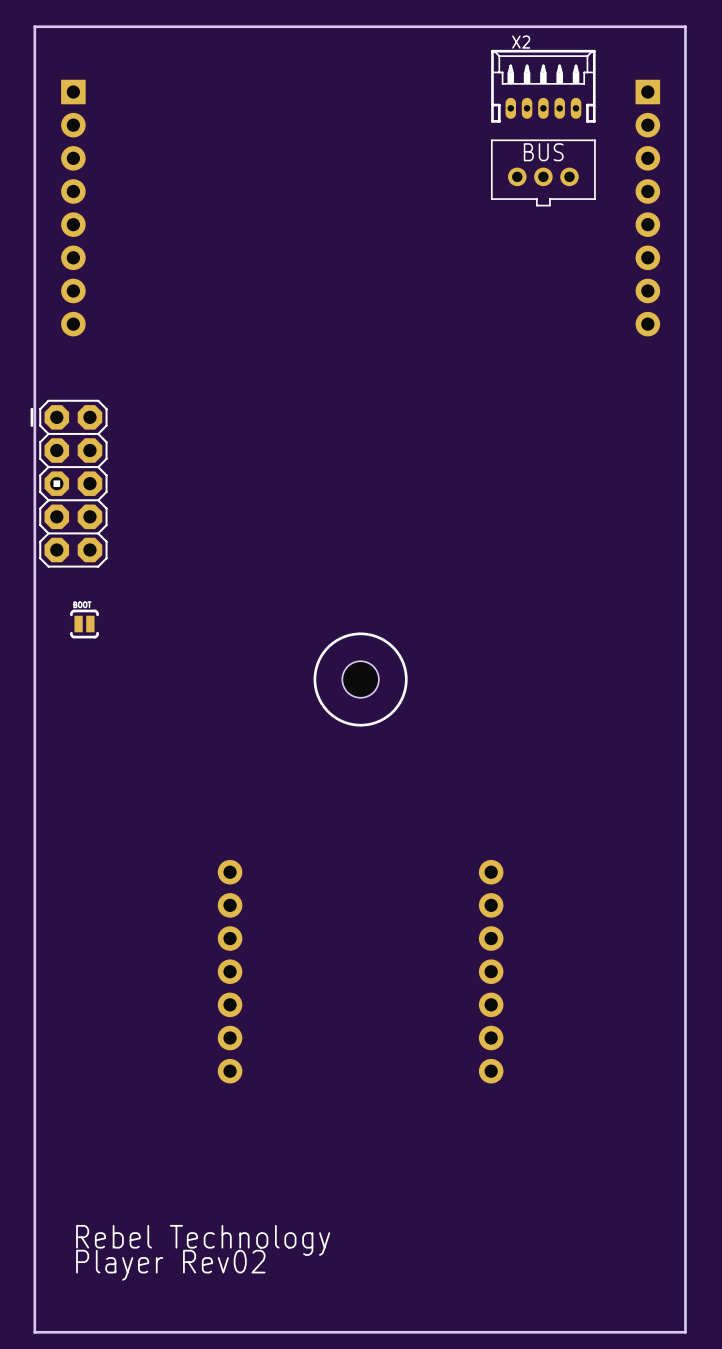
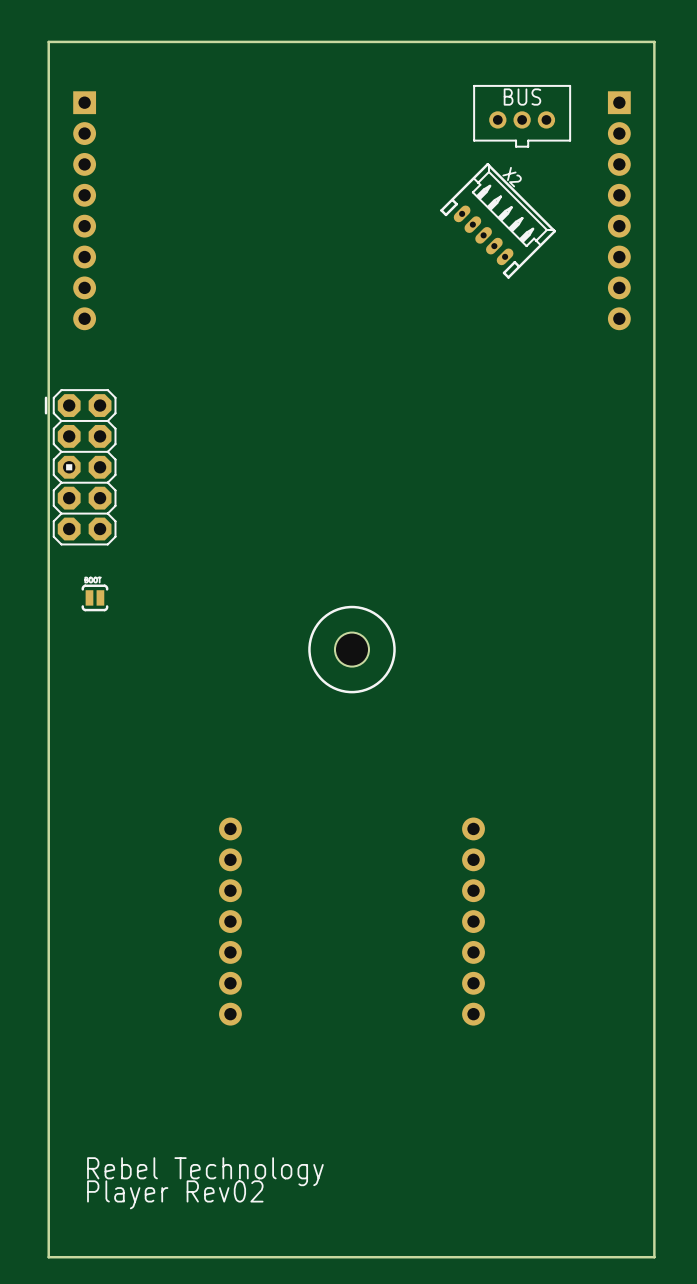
X2 rotation: 0° (543, 86) -> 45° clockwise (498, 220)
X2 position: (543, 86) -> (498, 220)
BUS position: (543, 172) -> (522, 116)

